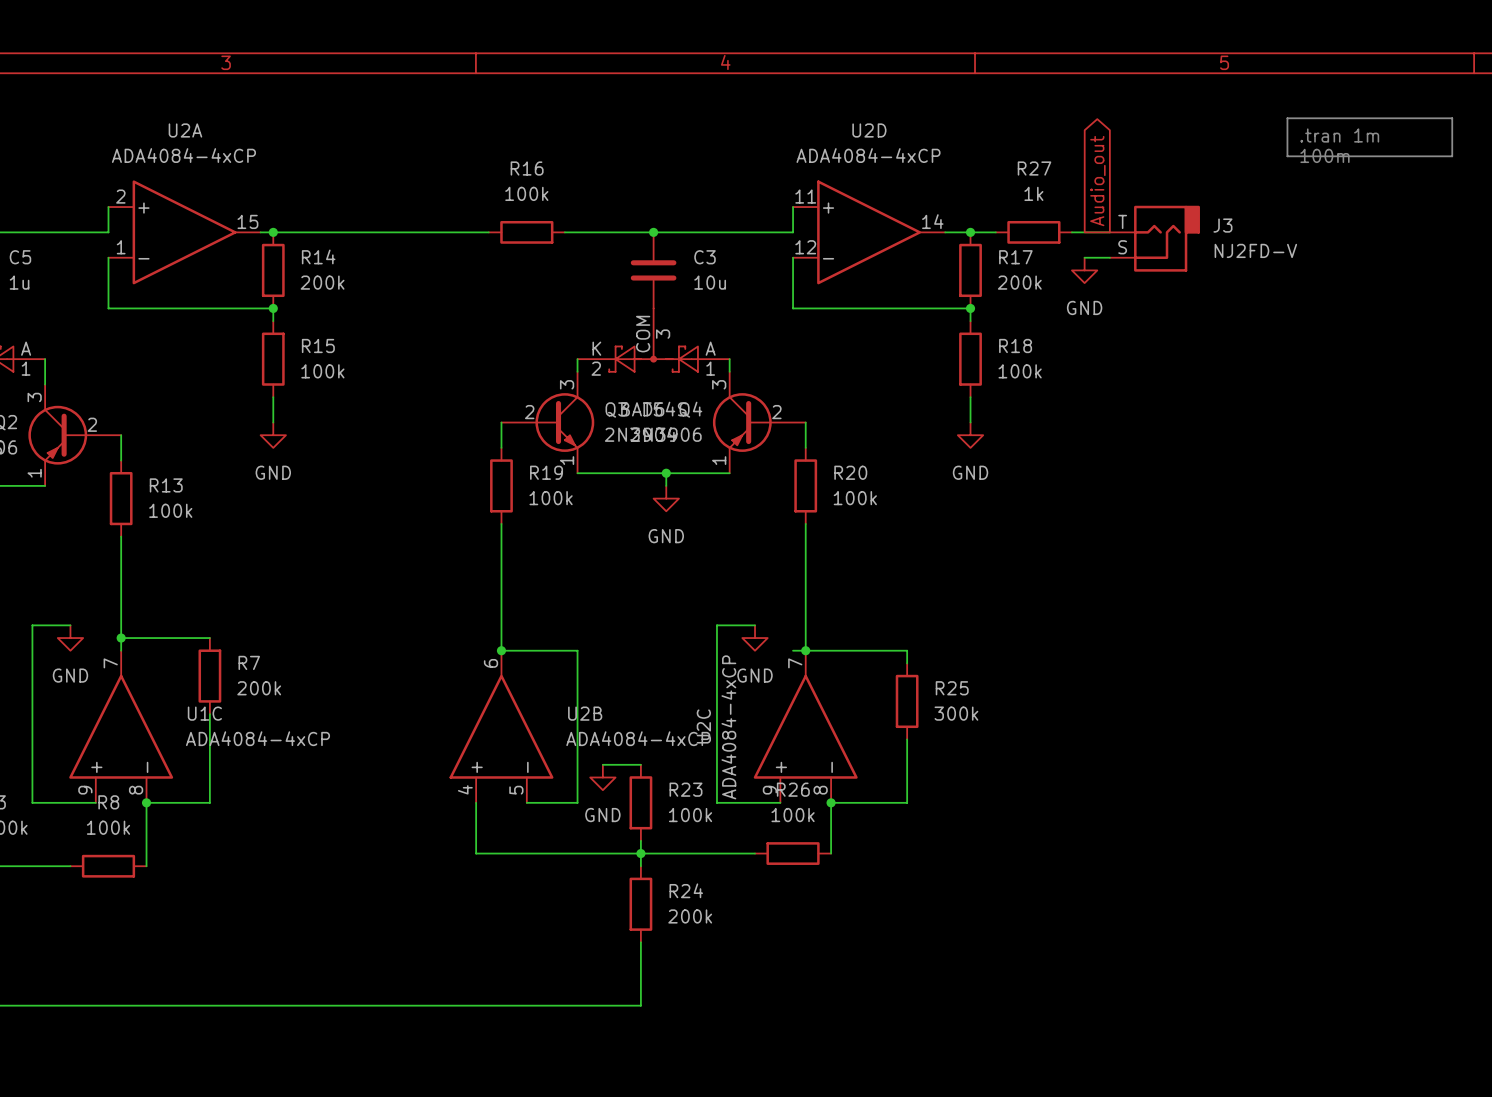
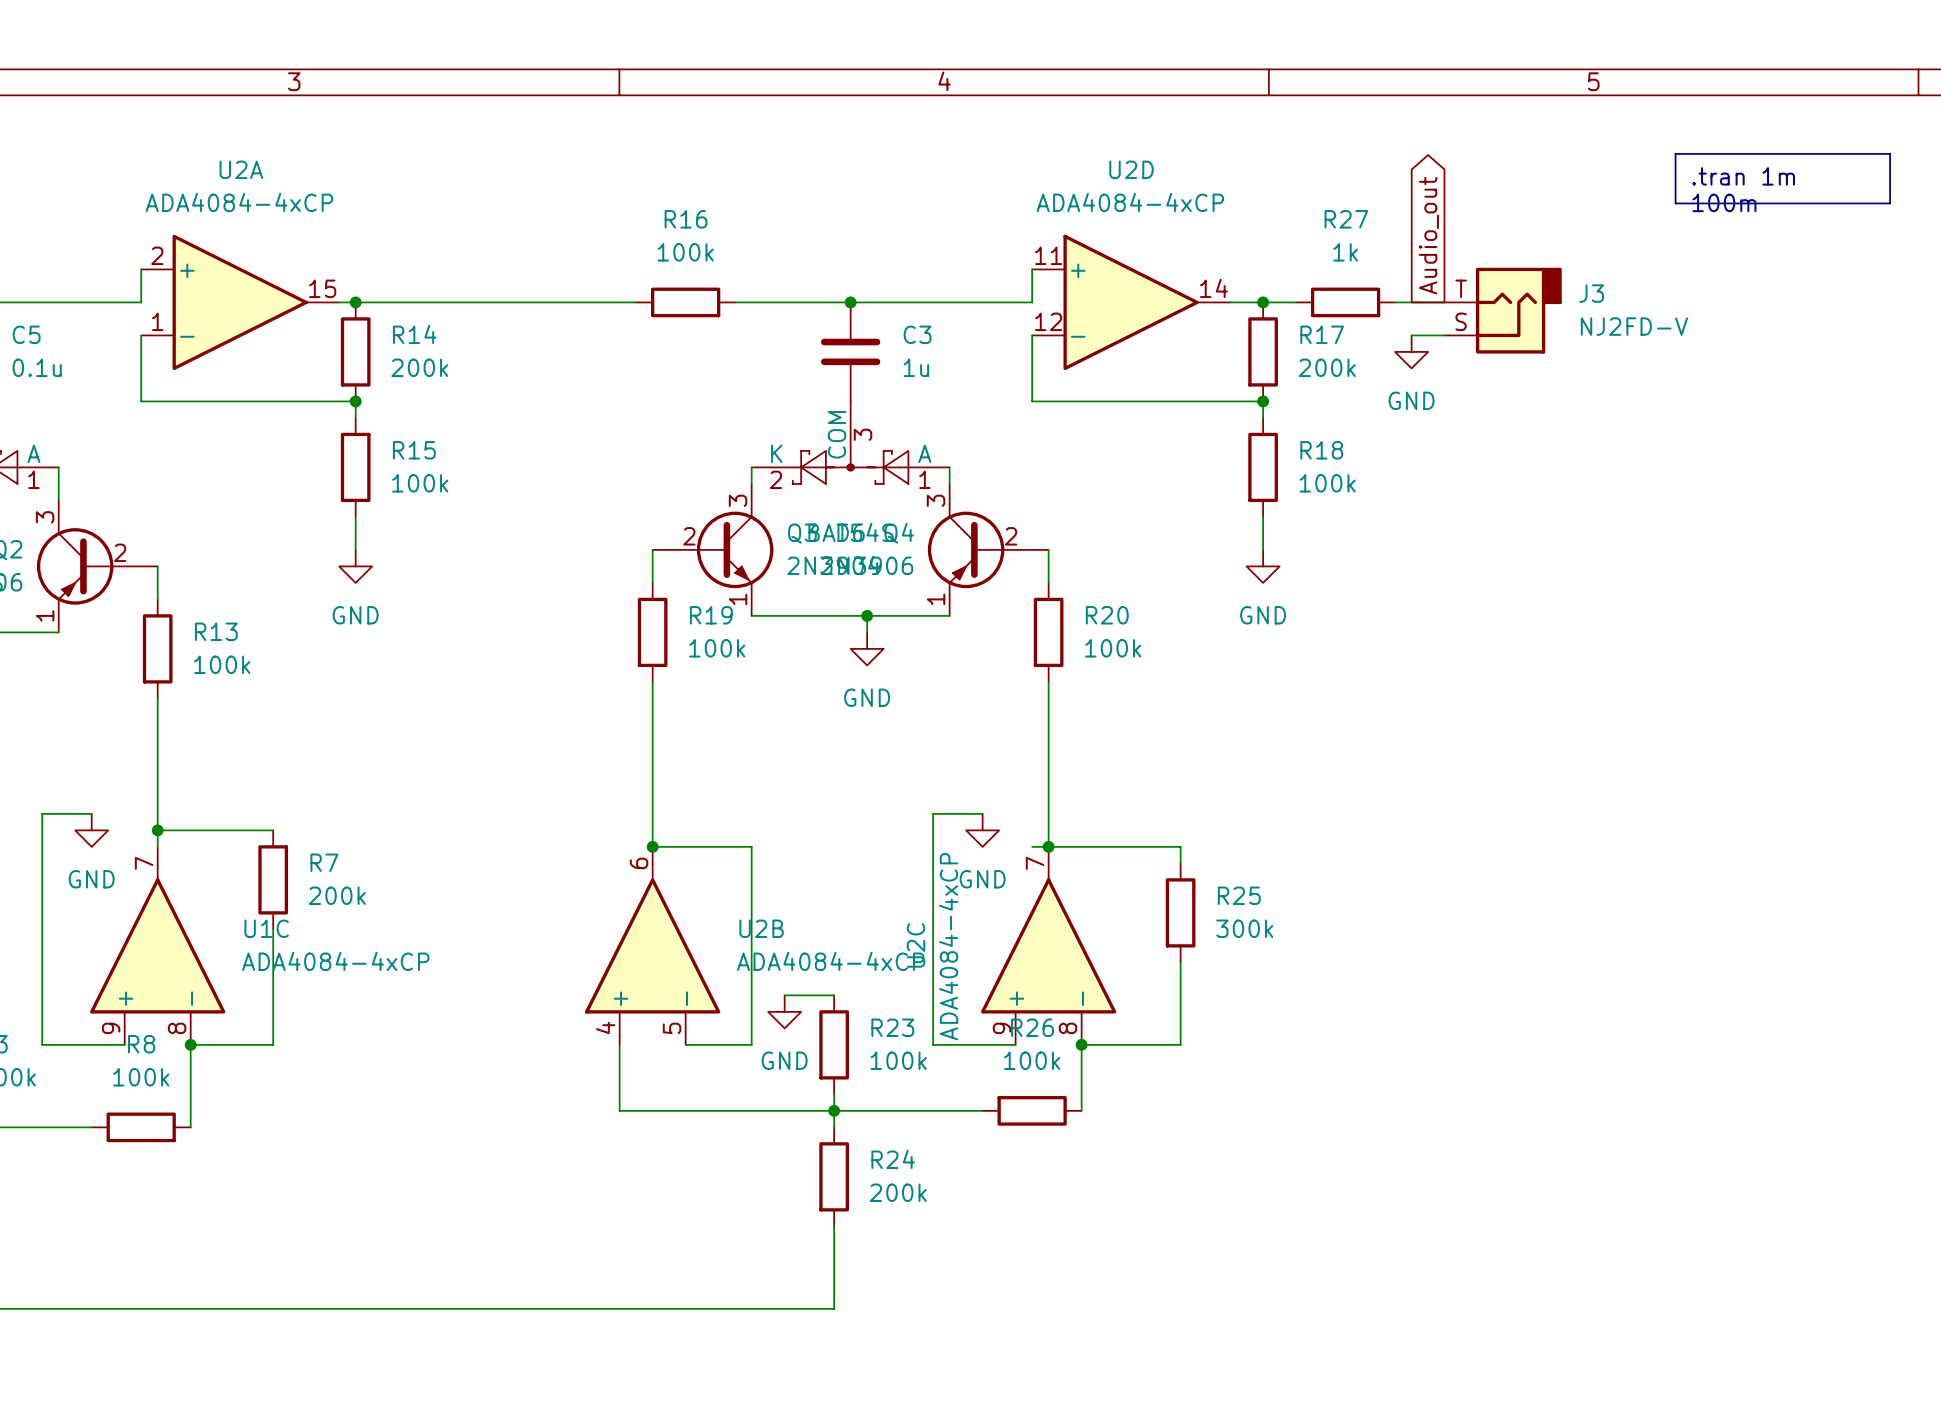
C5 value: 1u (19, 282) -> 0.1u (37, 367)
C3 value: 10u (710, 282) -> 1u (916, 367)

